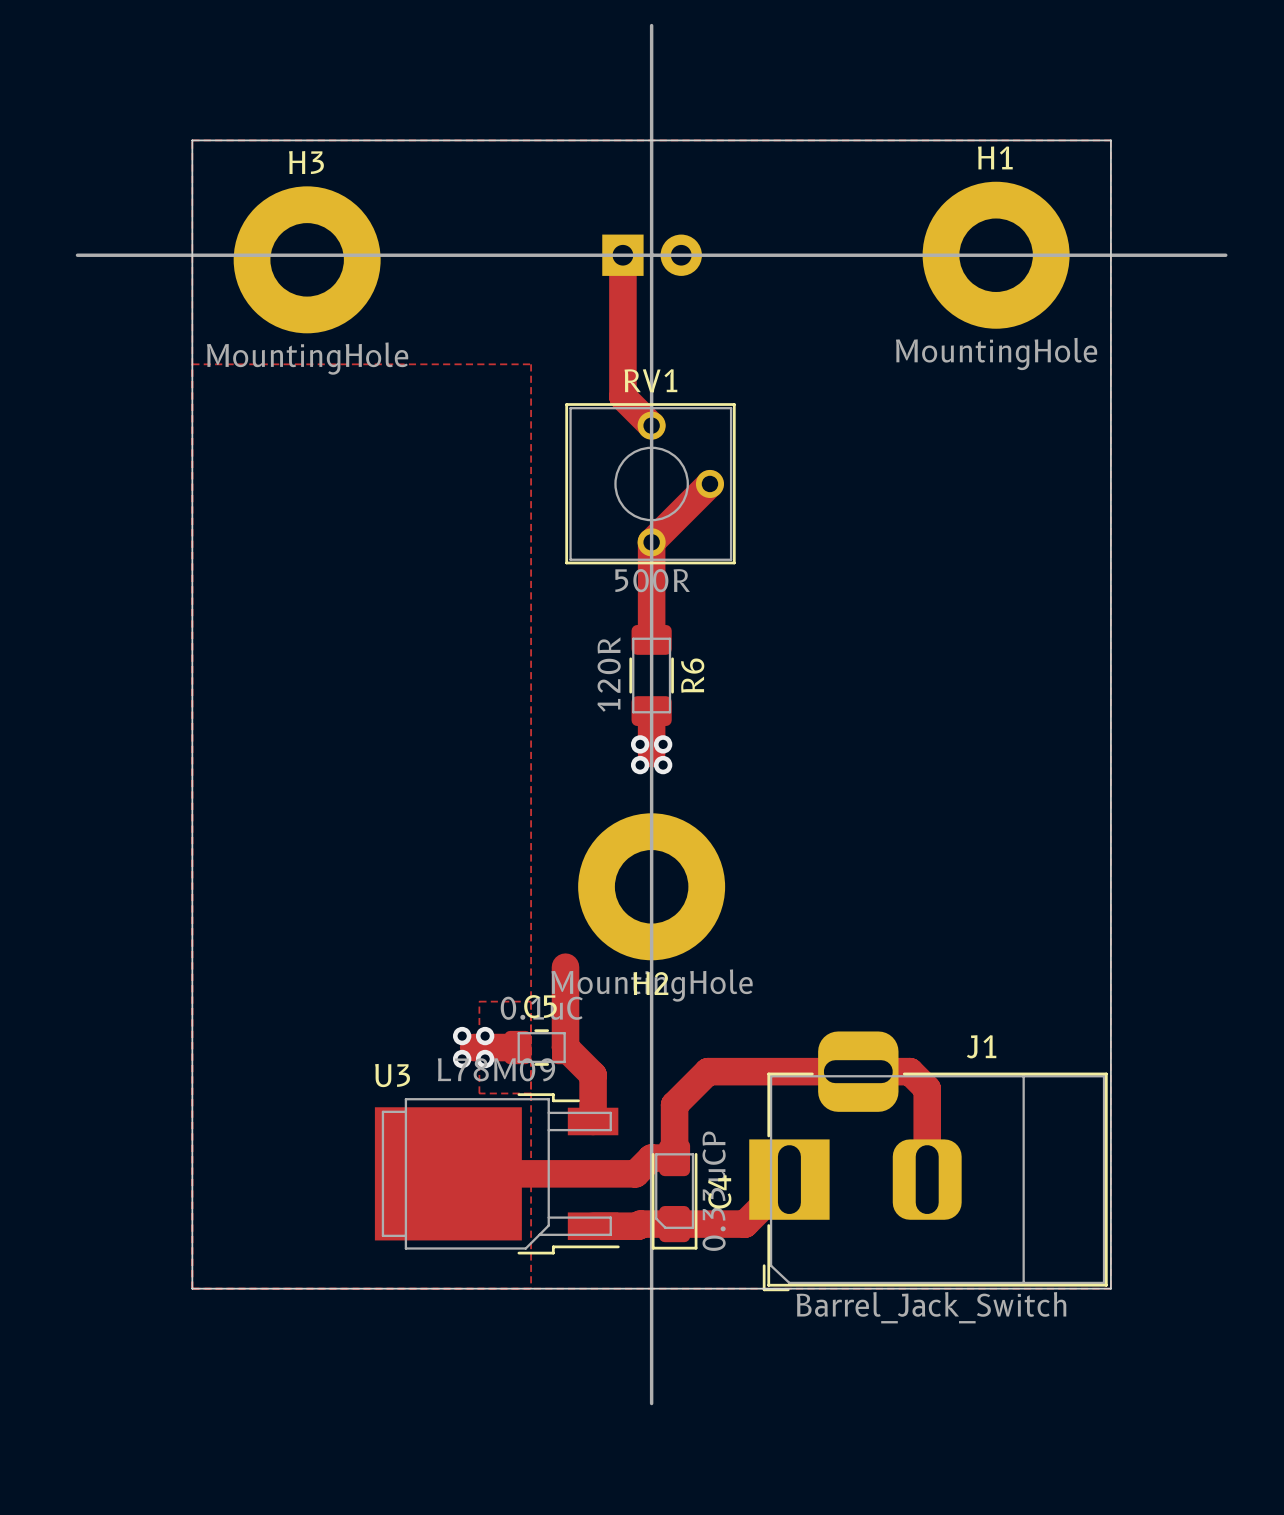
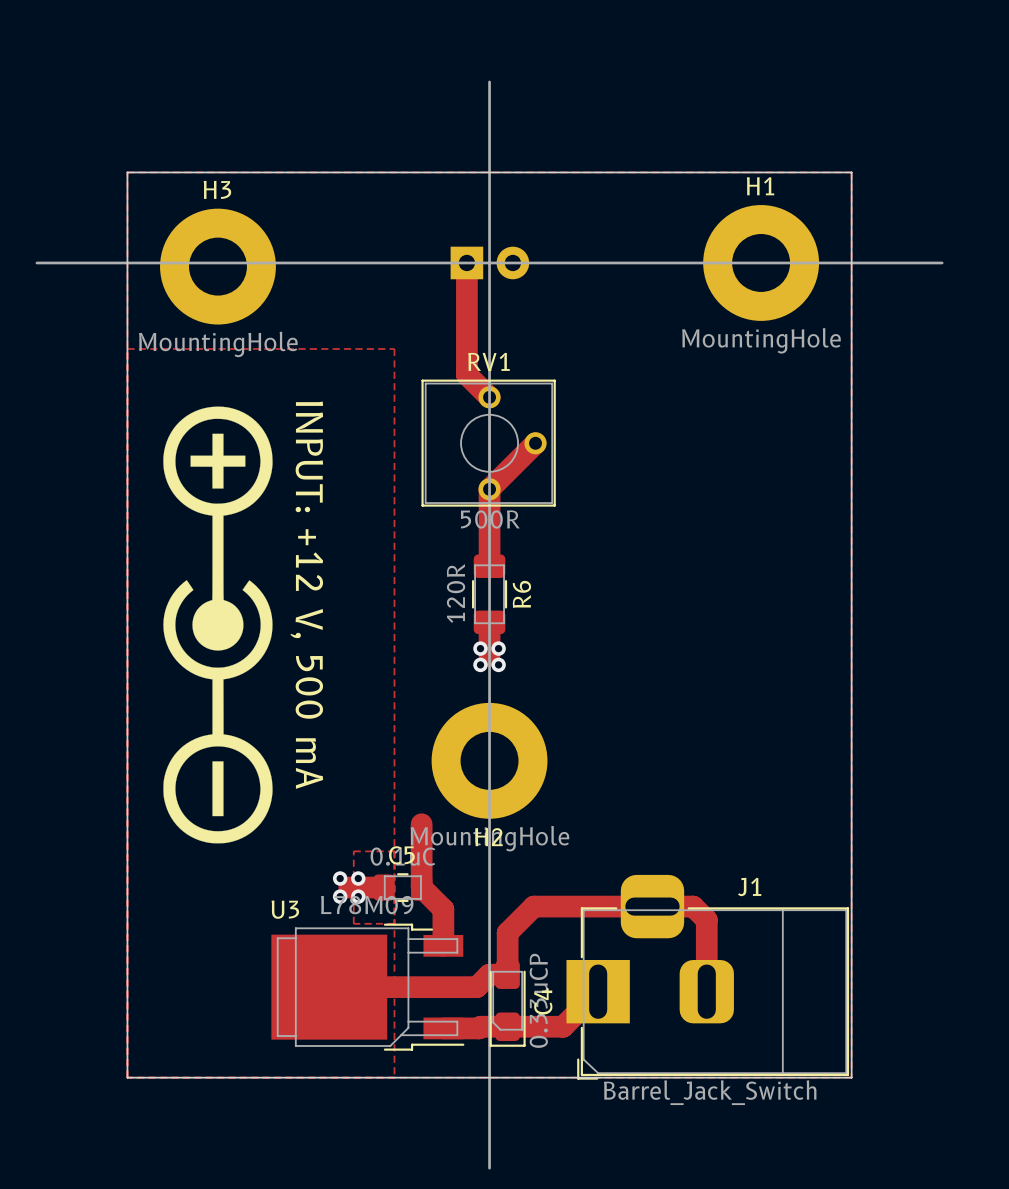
drawing: none -> [163, 406, 273, 844]
text: none -> INPUT: +12 V, 500 mA (306, 595)

